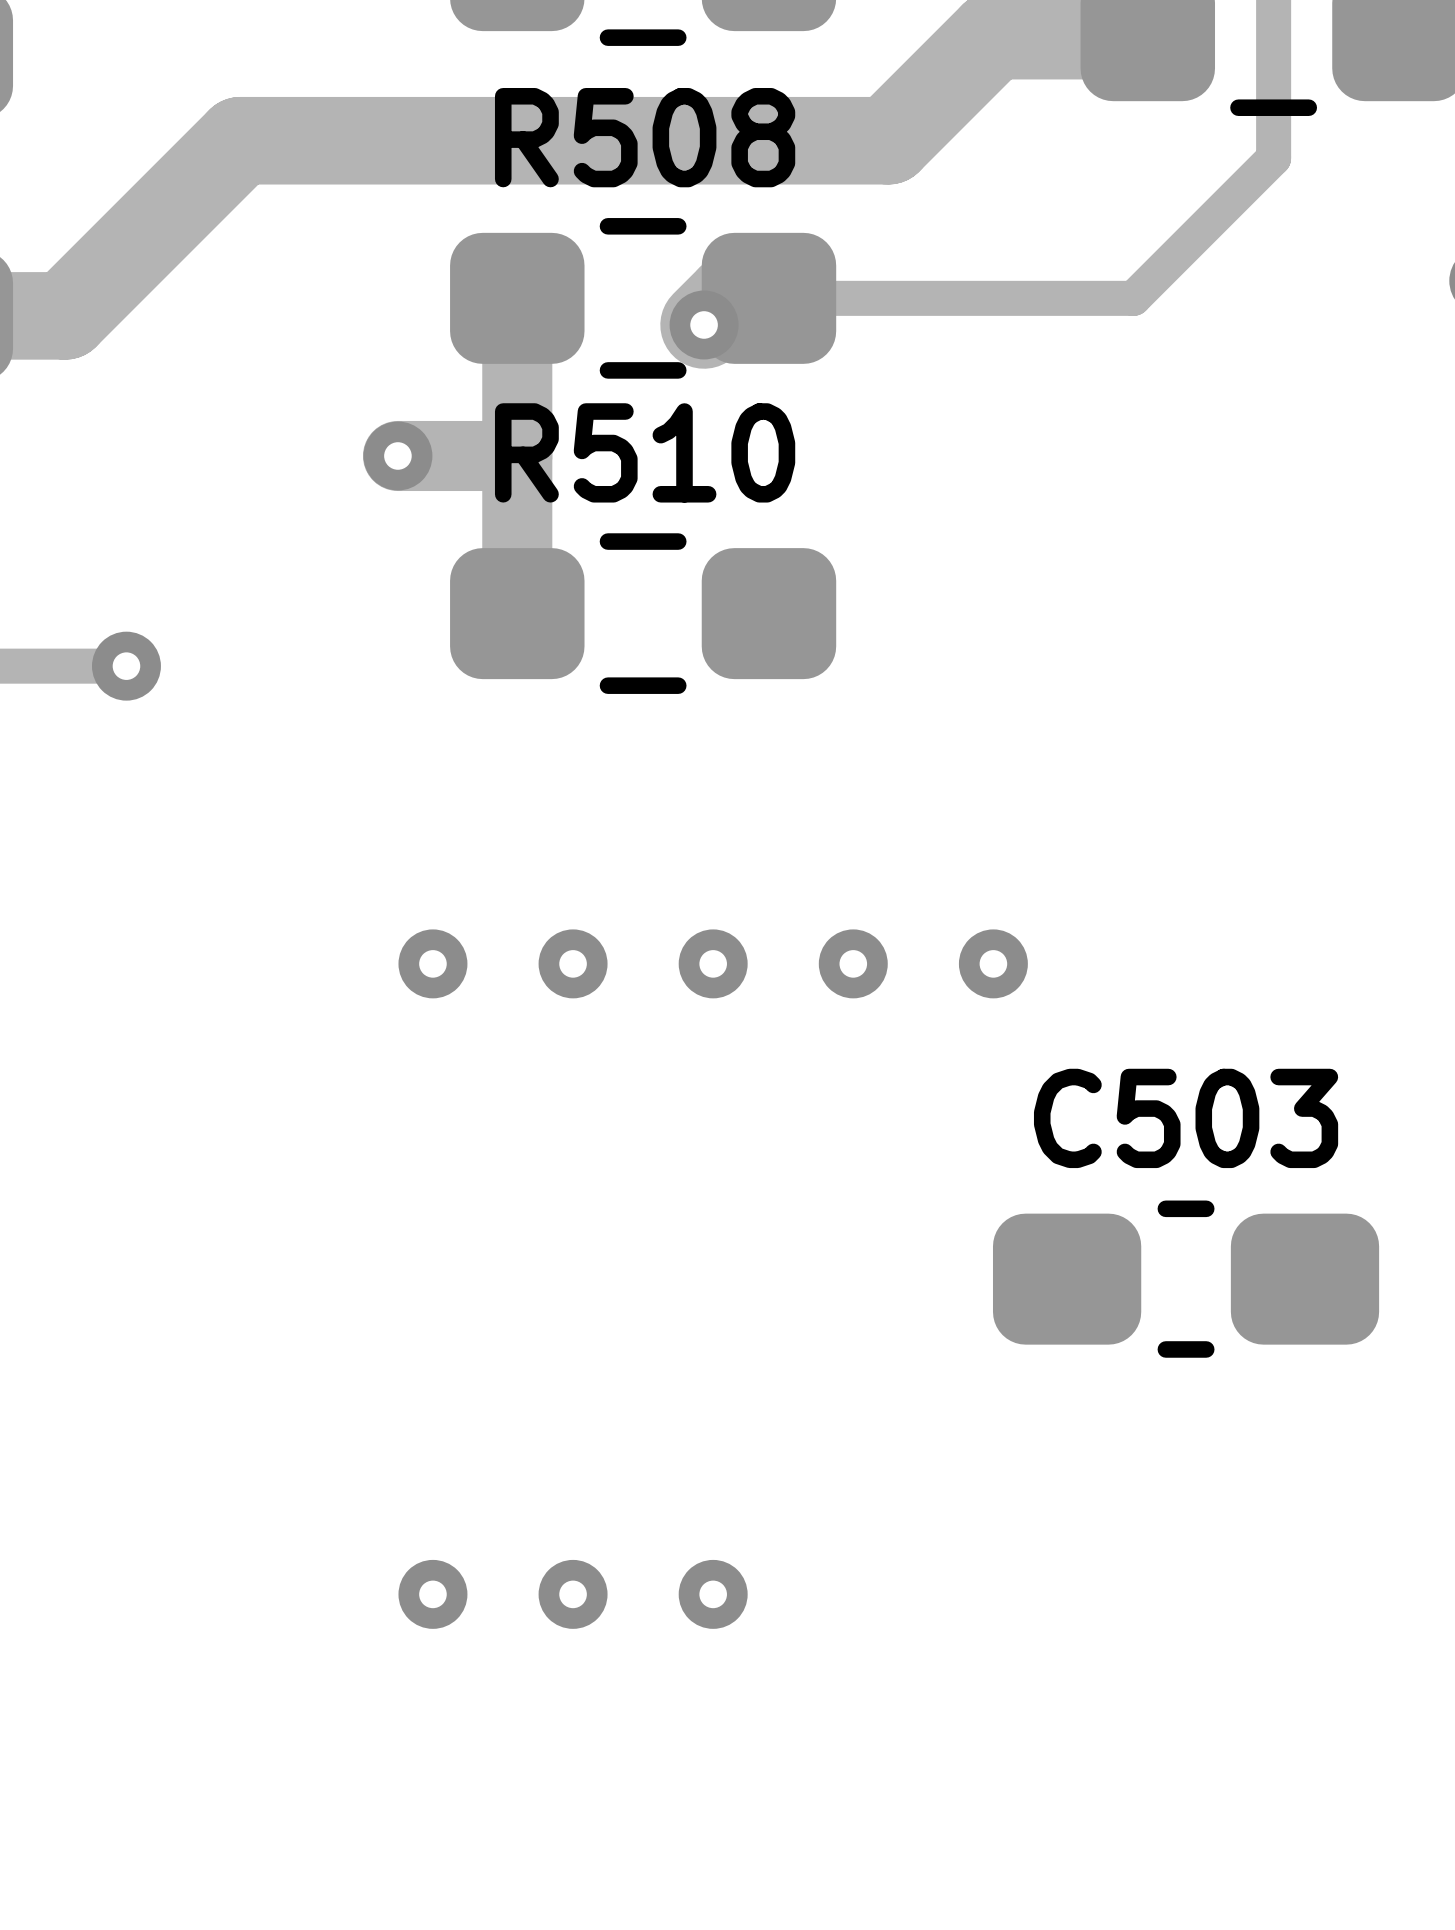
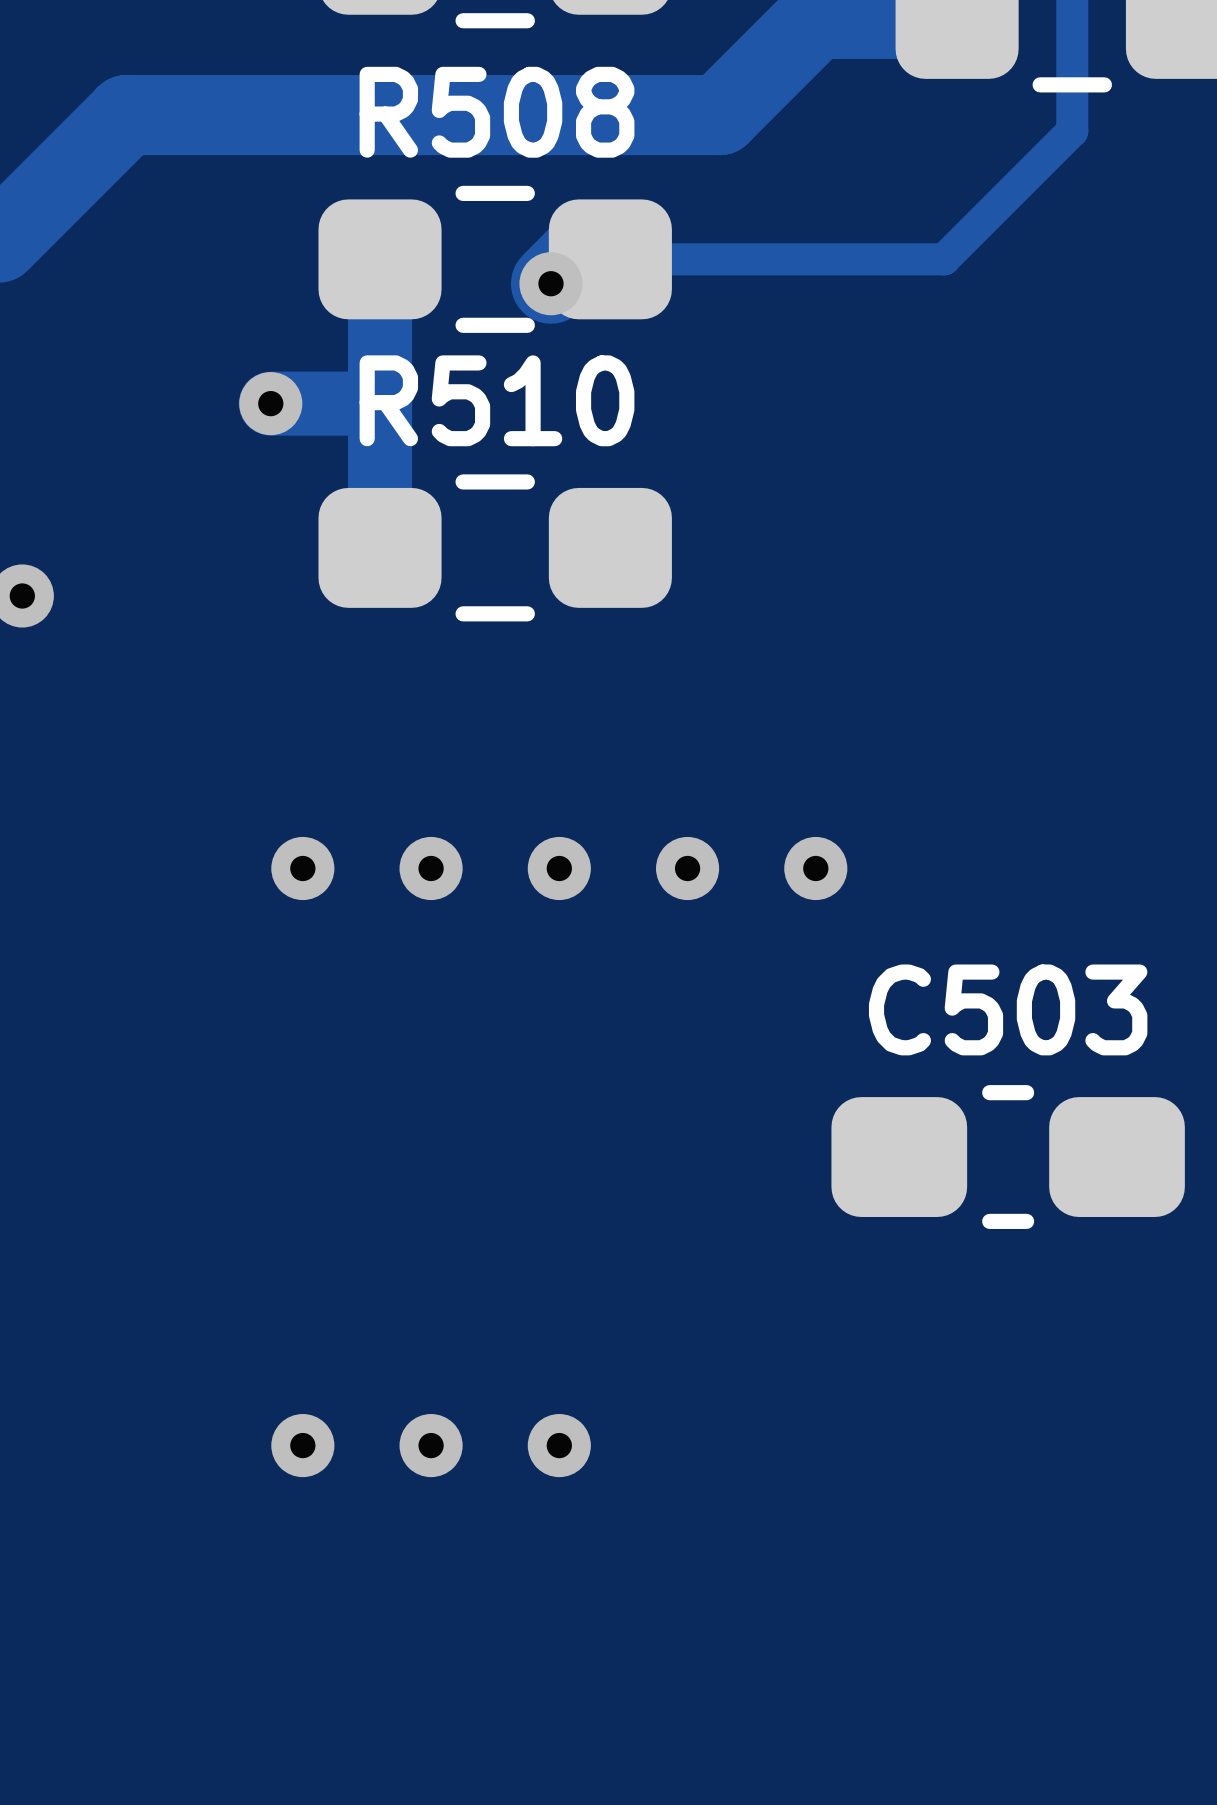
C503 position: (1186, 1279) -> (1008, 1157)

